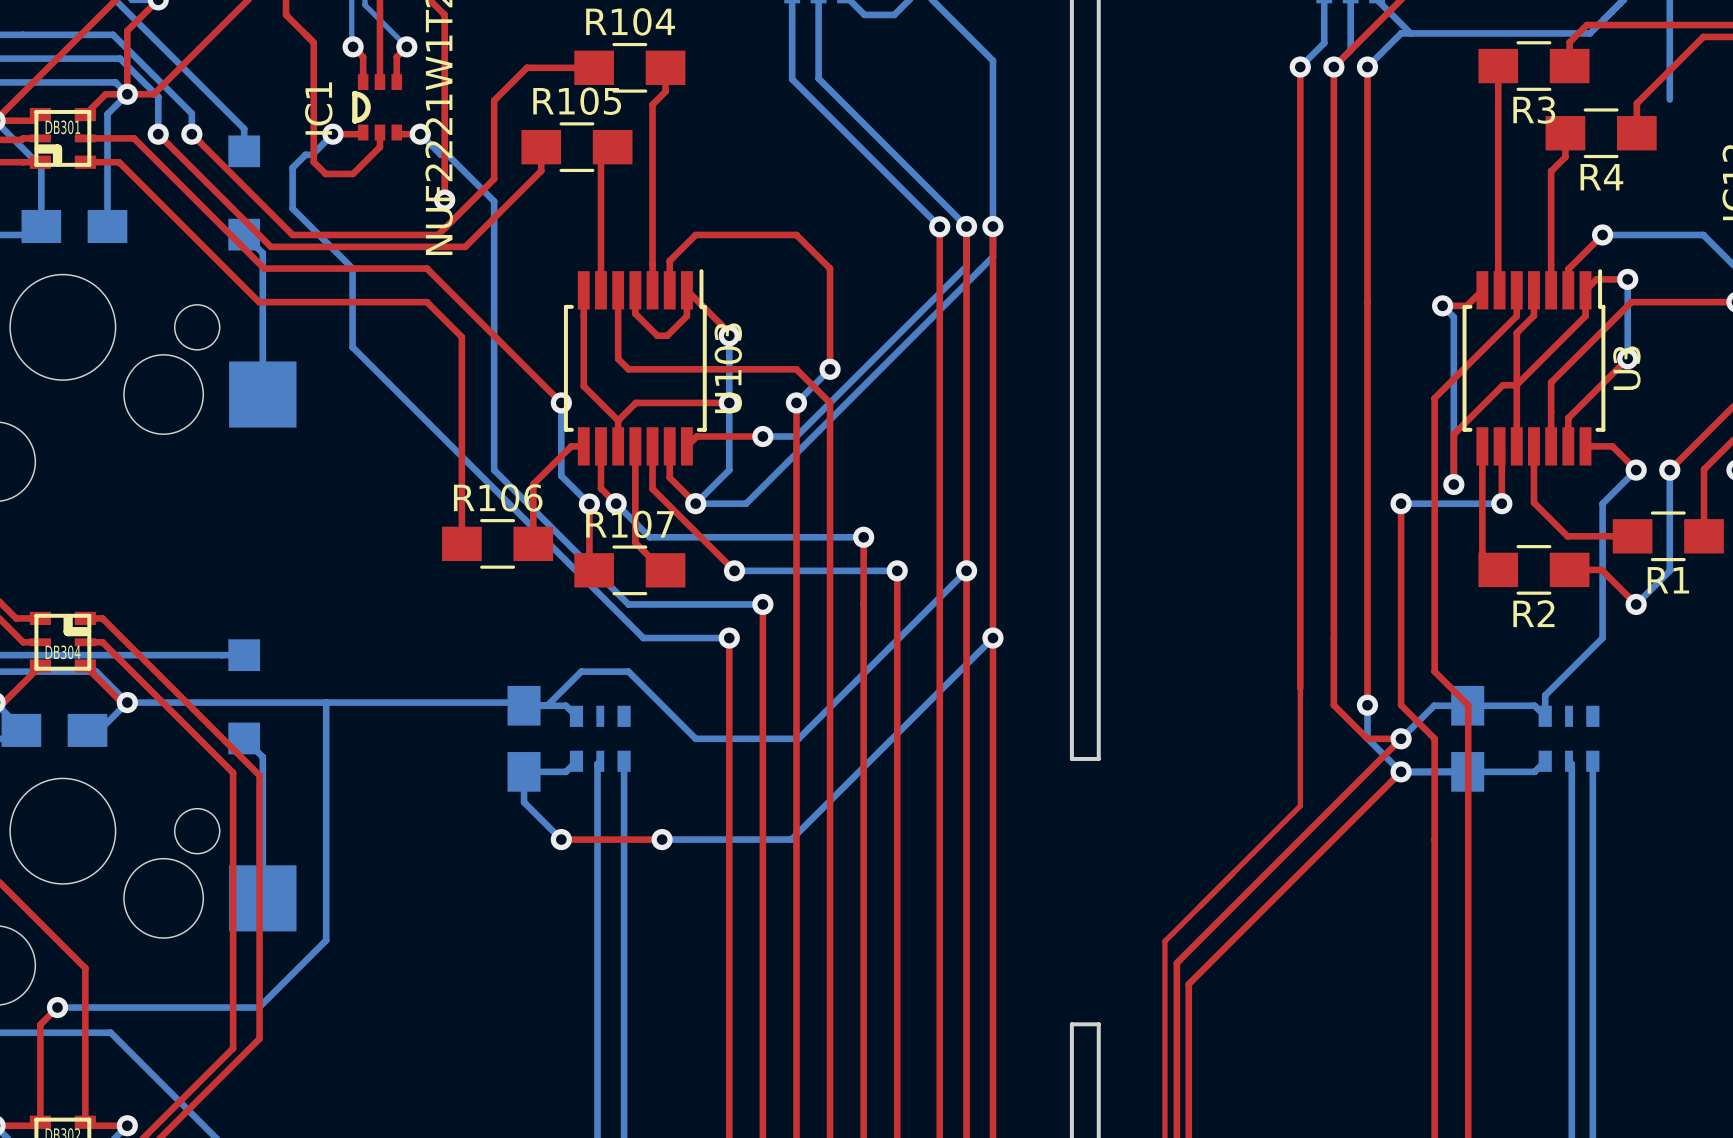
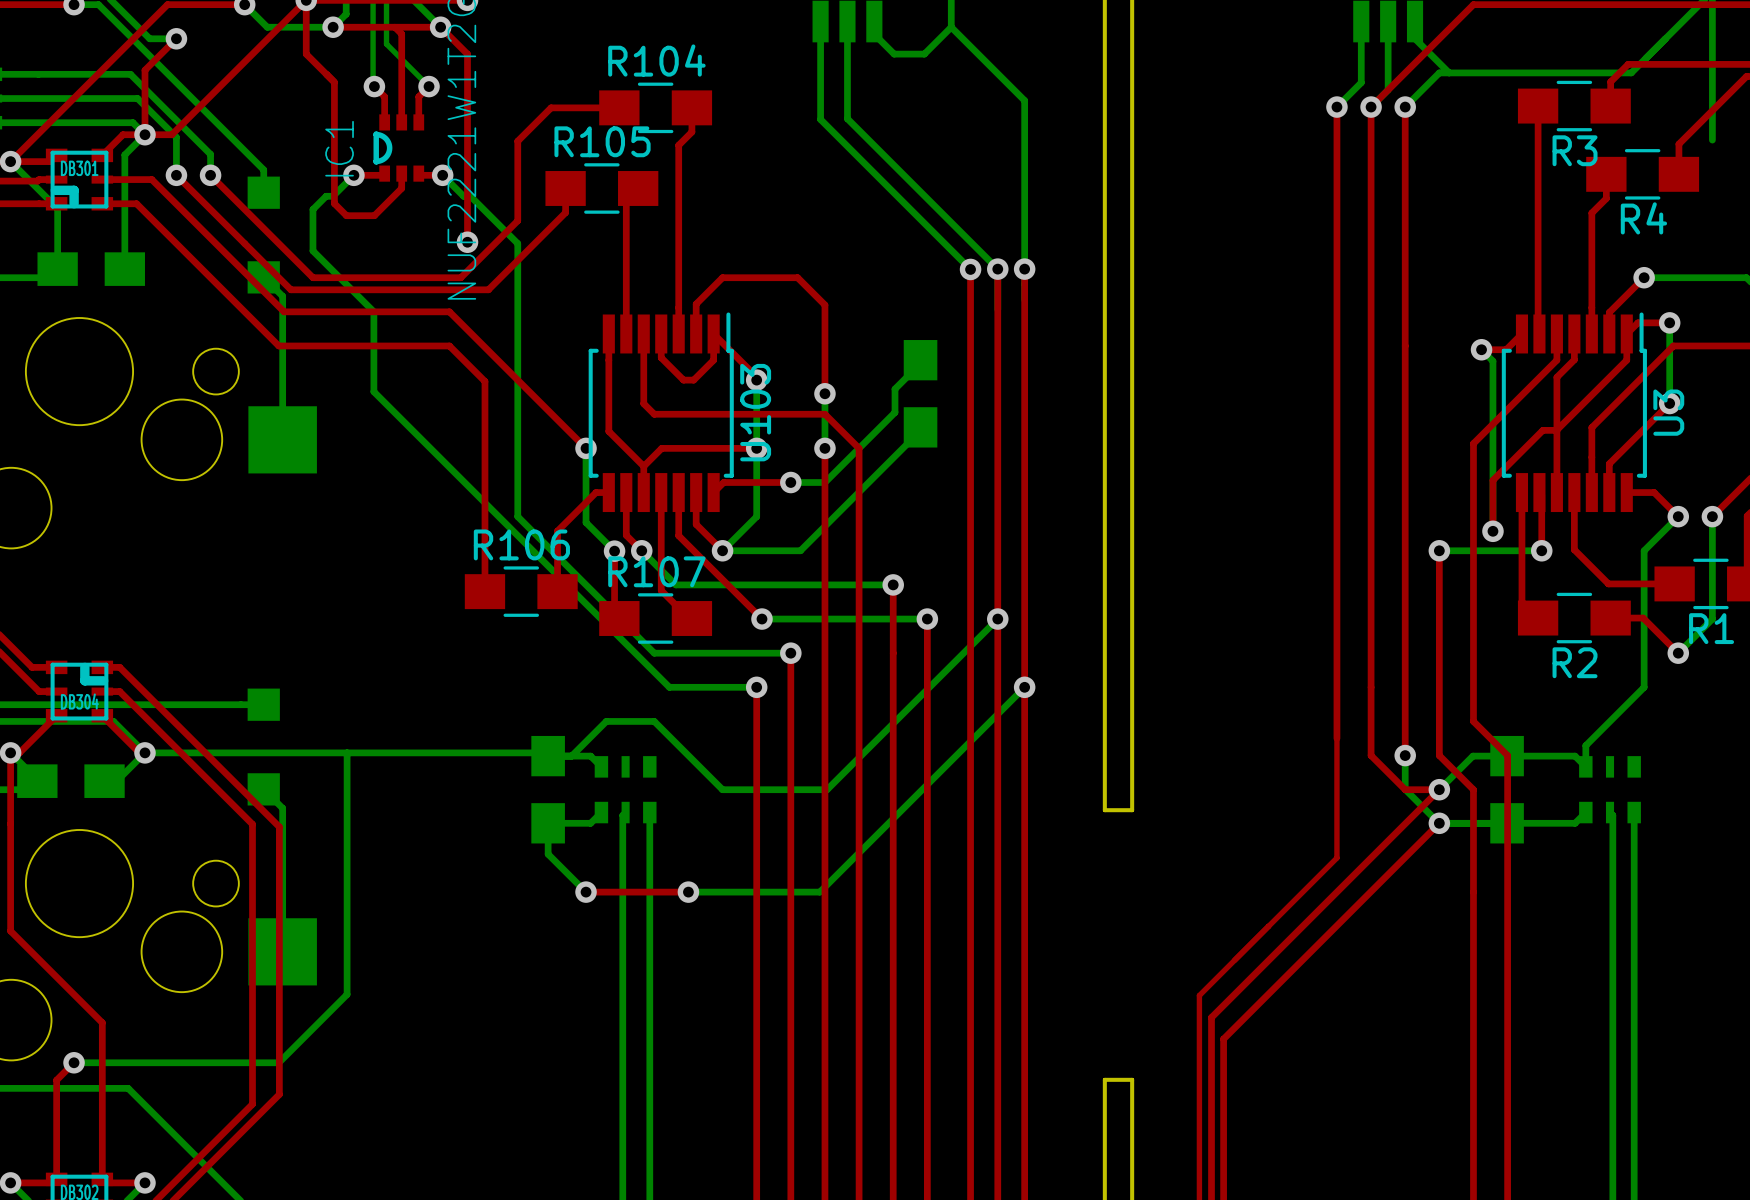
top track: (769, 234) (796, 234) (830, 268) (830, 369) -> (797, 277) (824, 305) (824, 393)
bottom track: (992, 256) (746, 503) -> (920, 427) (920, 430) (800, 550) (773, 550)
bottom track: (966, 266) (865, 367) -> (920, 360) (920, 363) (895, 389) (895, 412)
part: none -> (920, 393)
bottom track: (830, 369) (796, 402) -> (824, 393) (824, 448)
via position: (830, 369) -> (824, 393)

